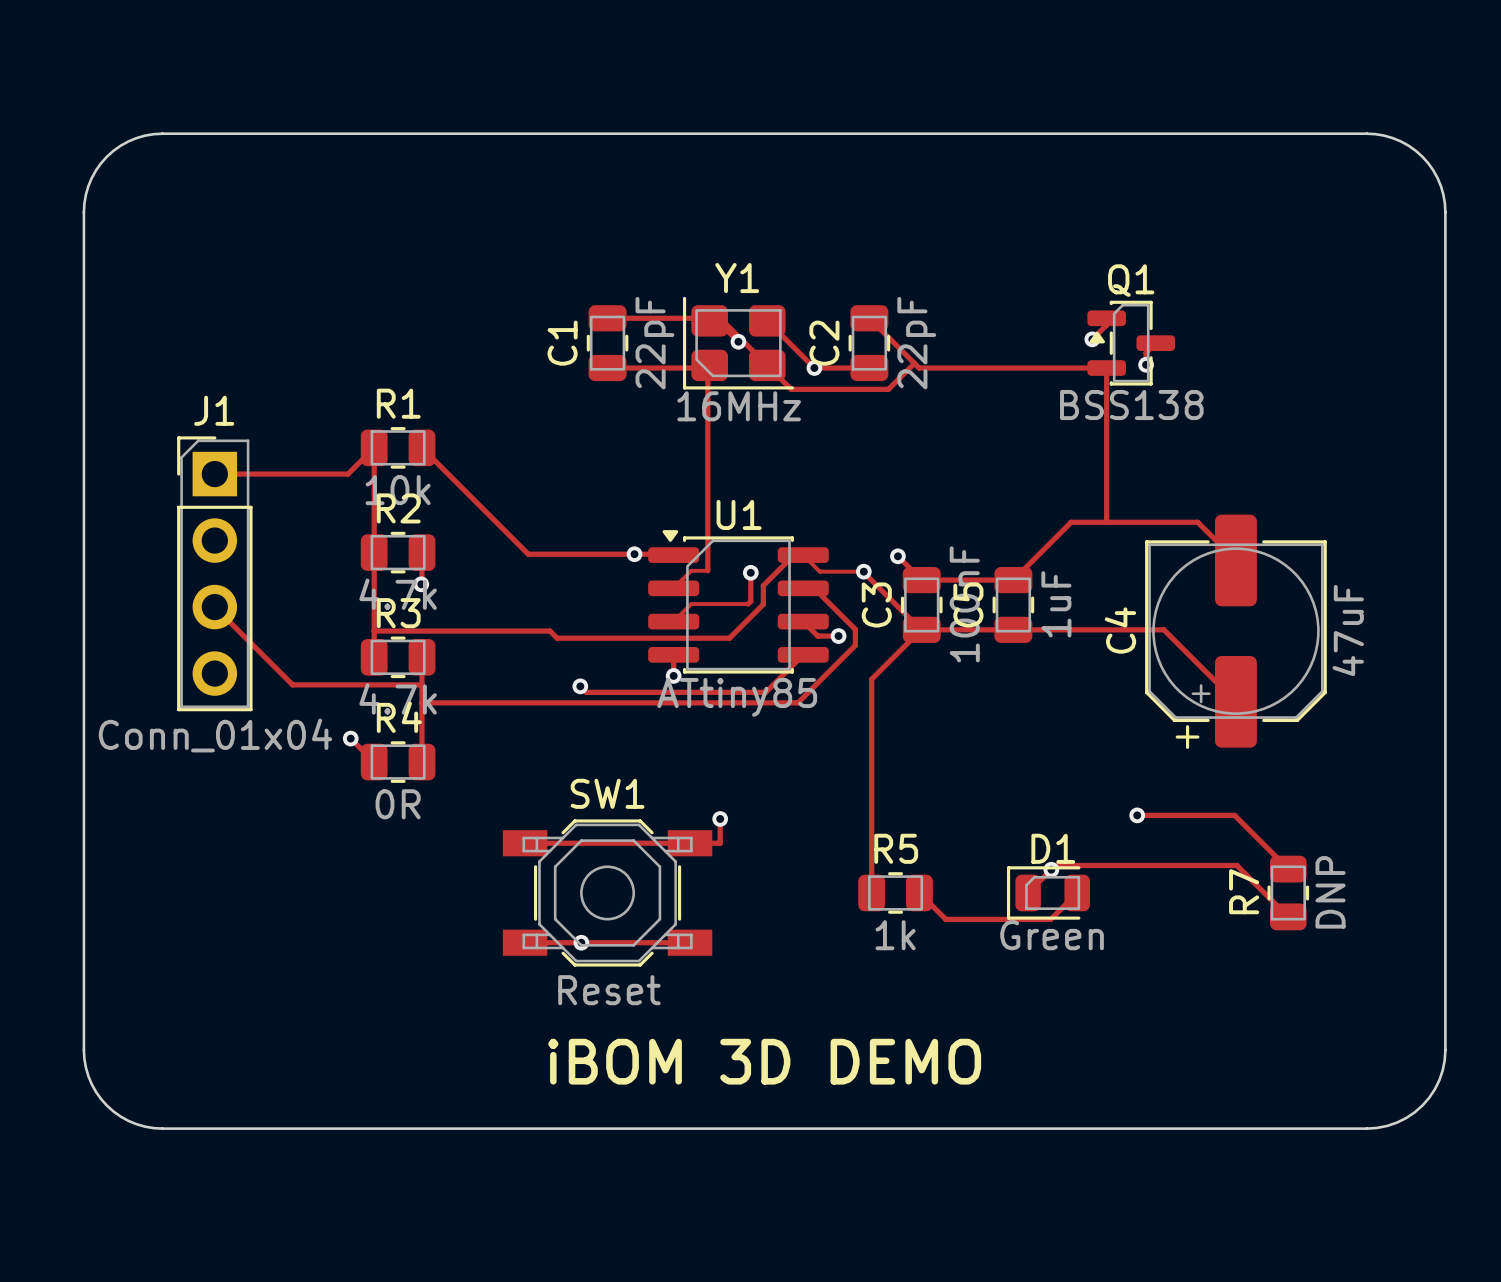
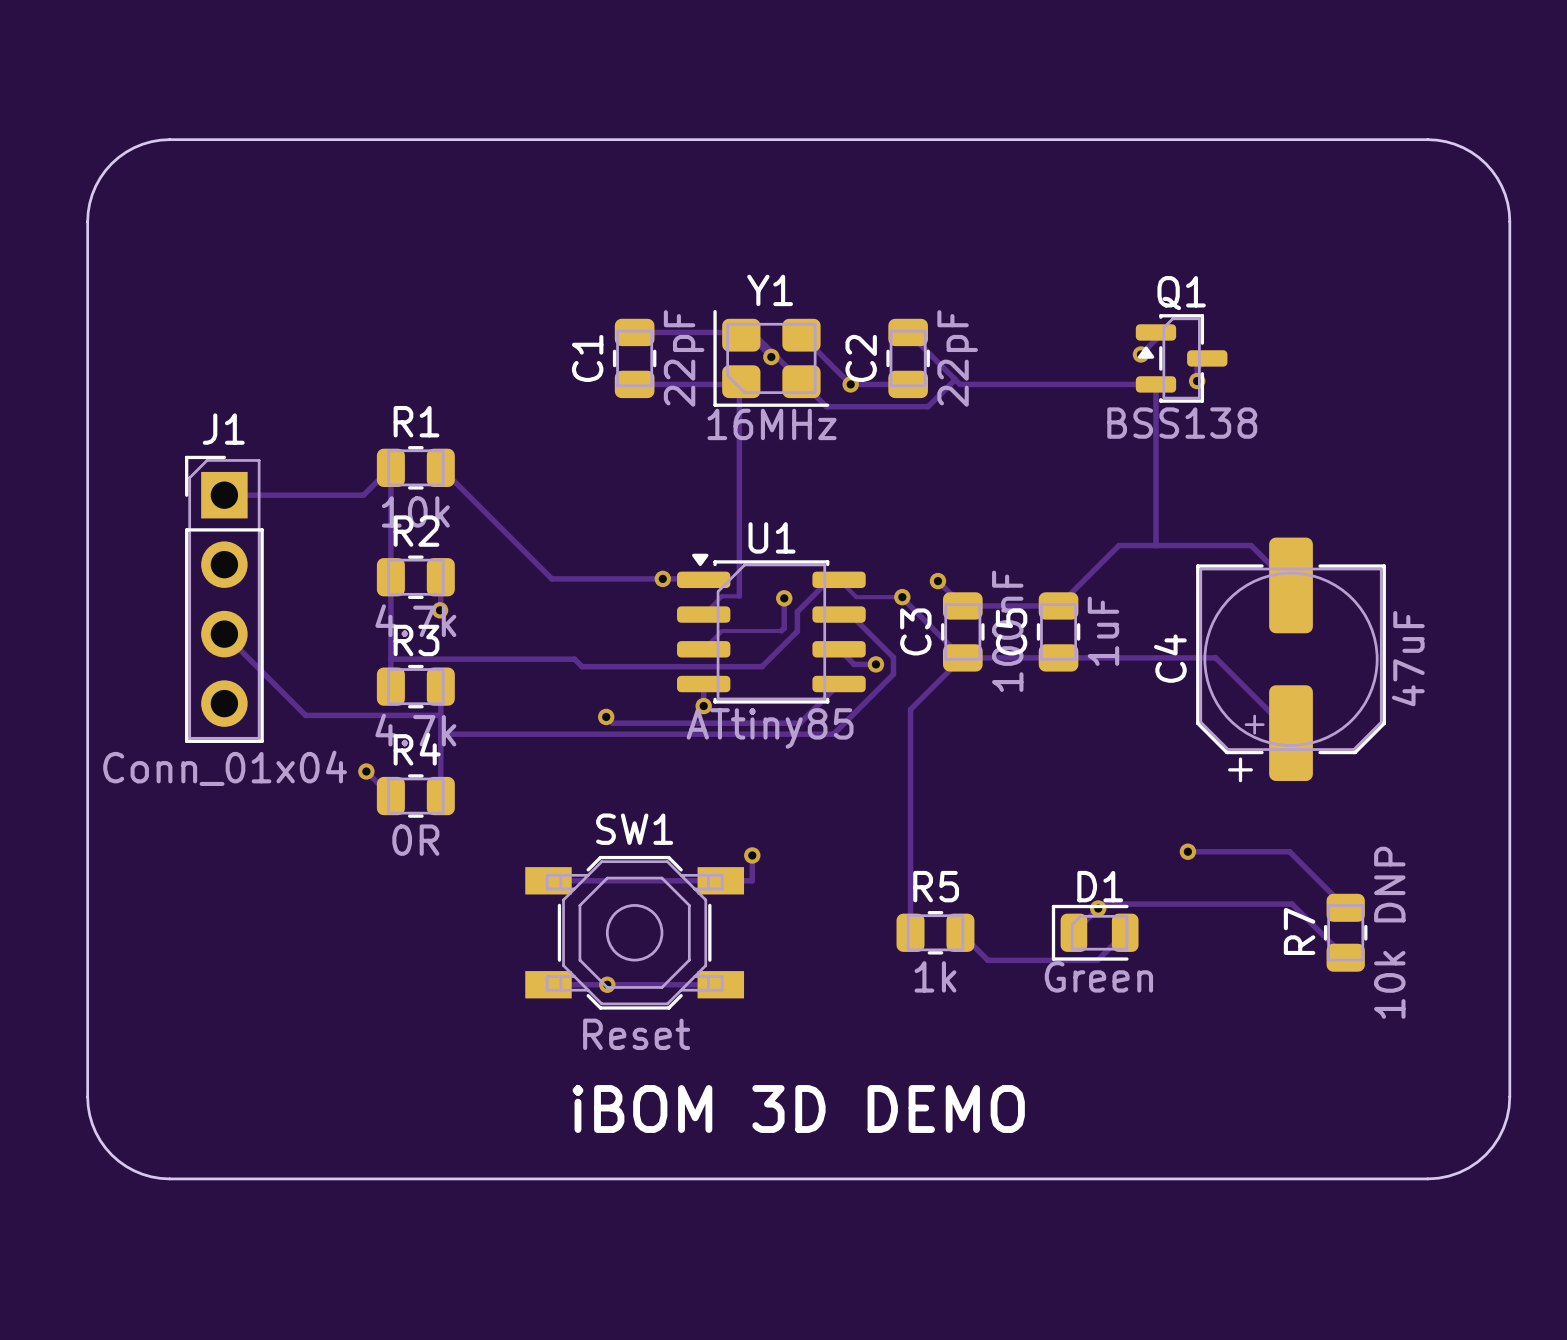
R7 value: DNP (1330, 892) -> 10k DNP (1389, 932)

